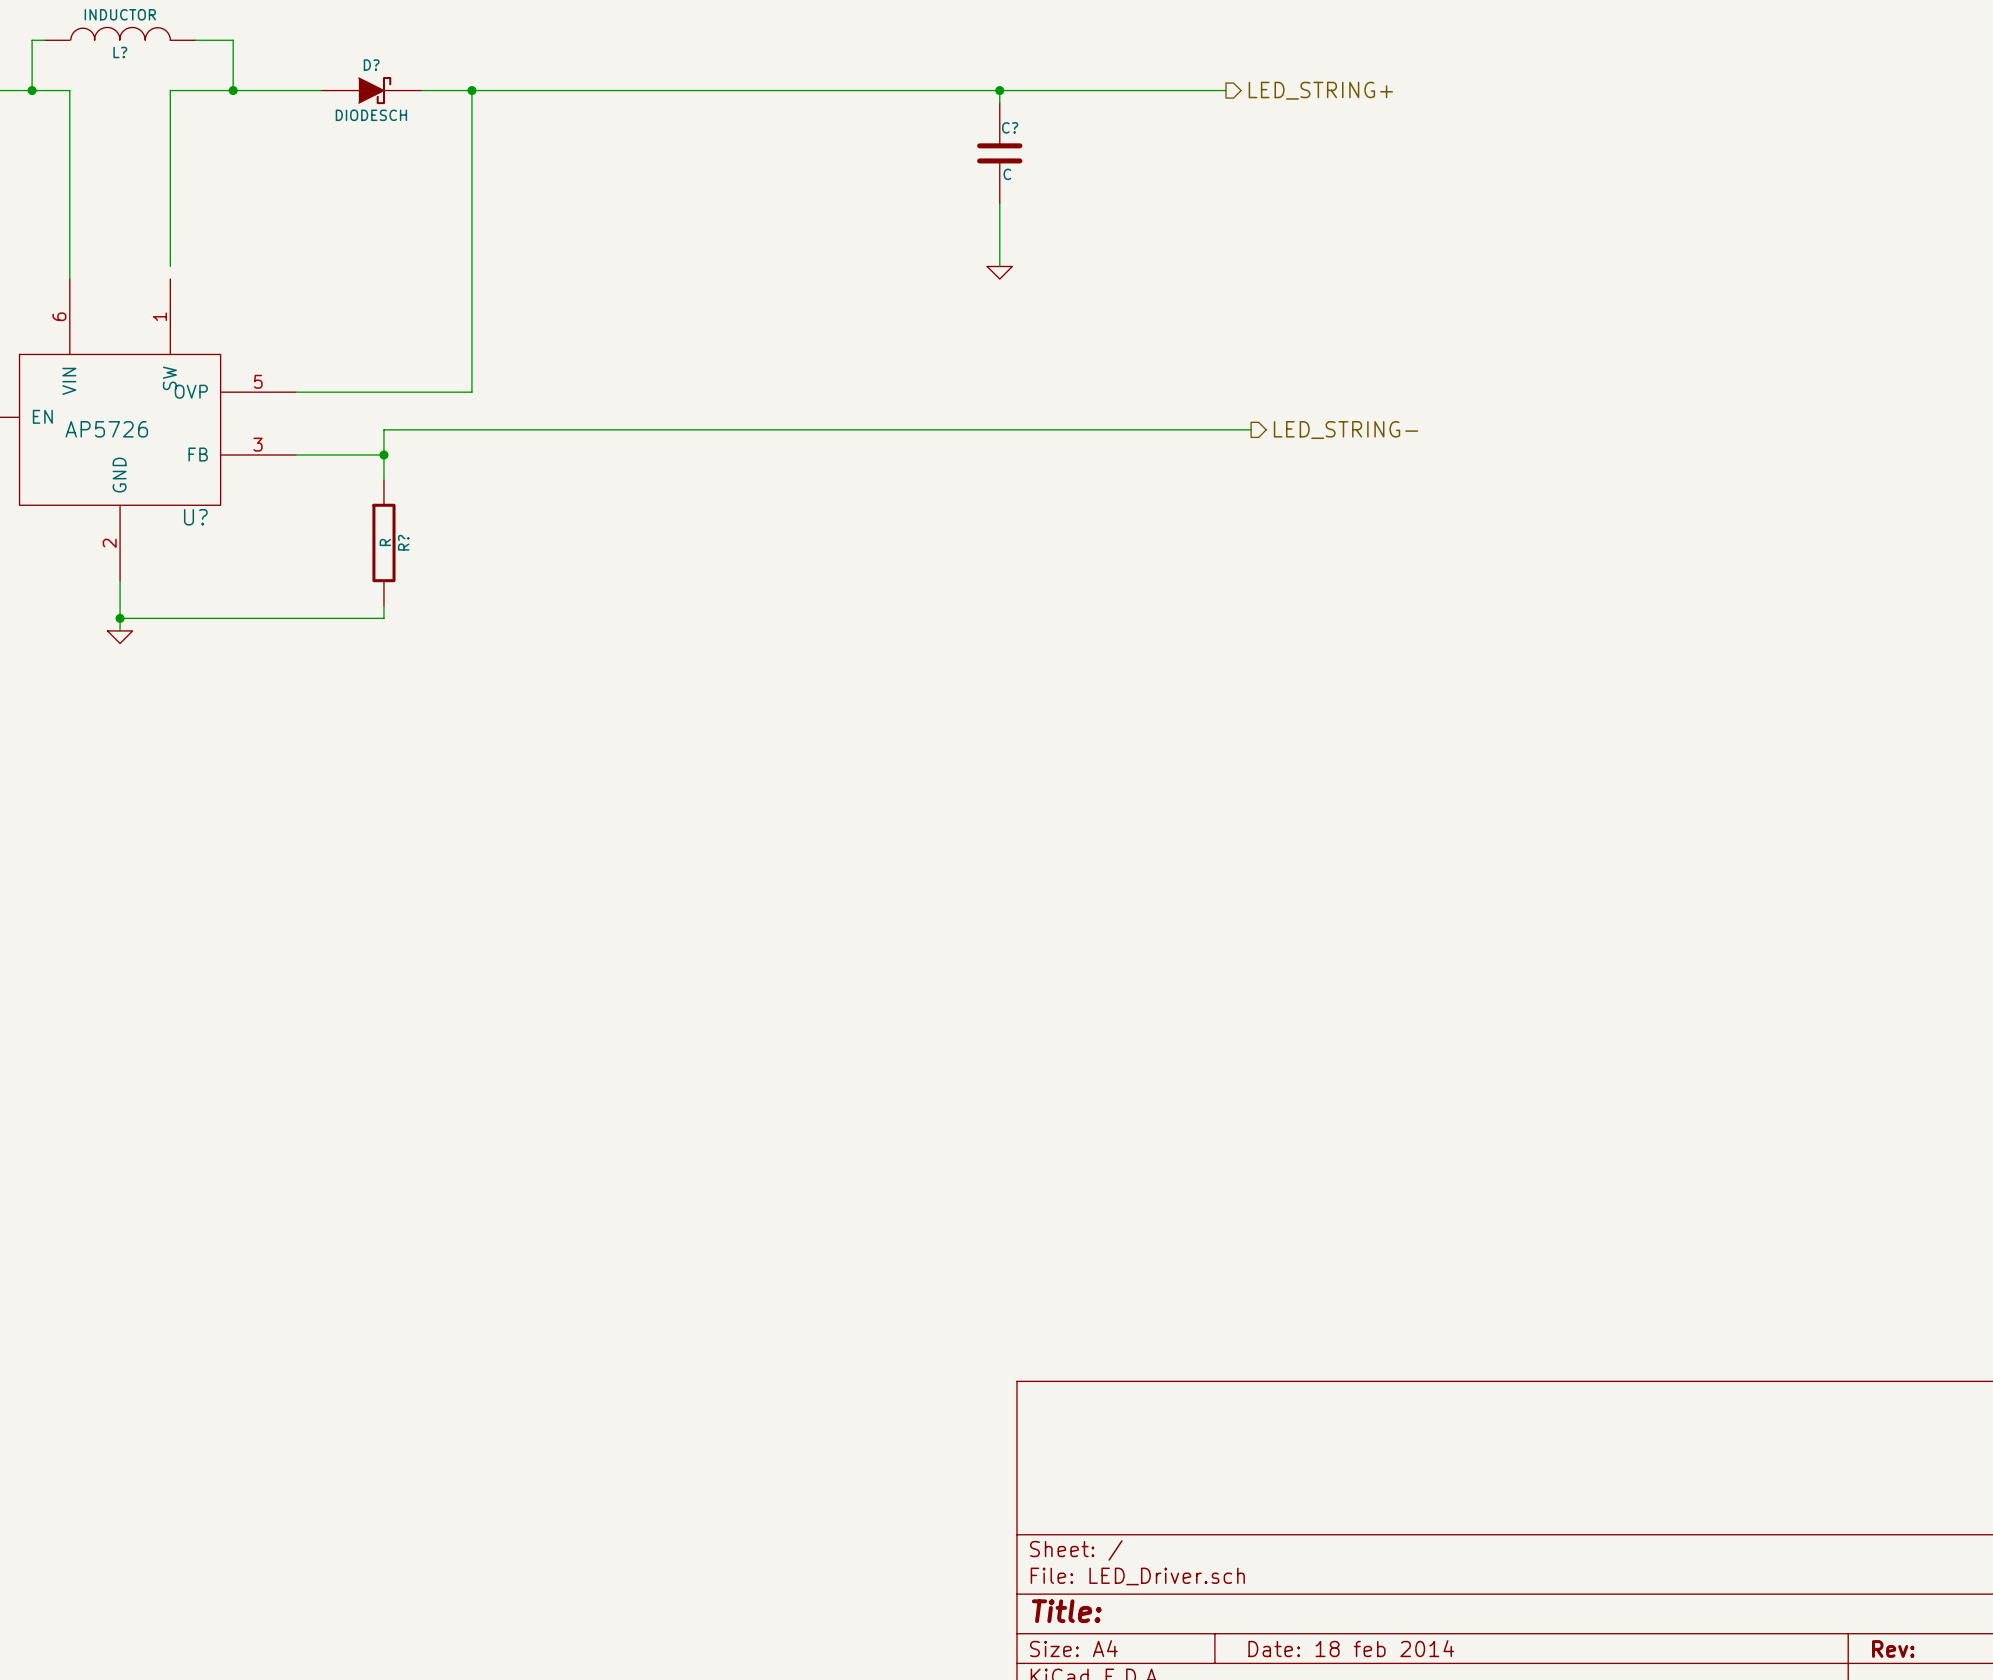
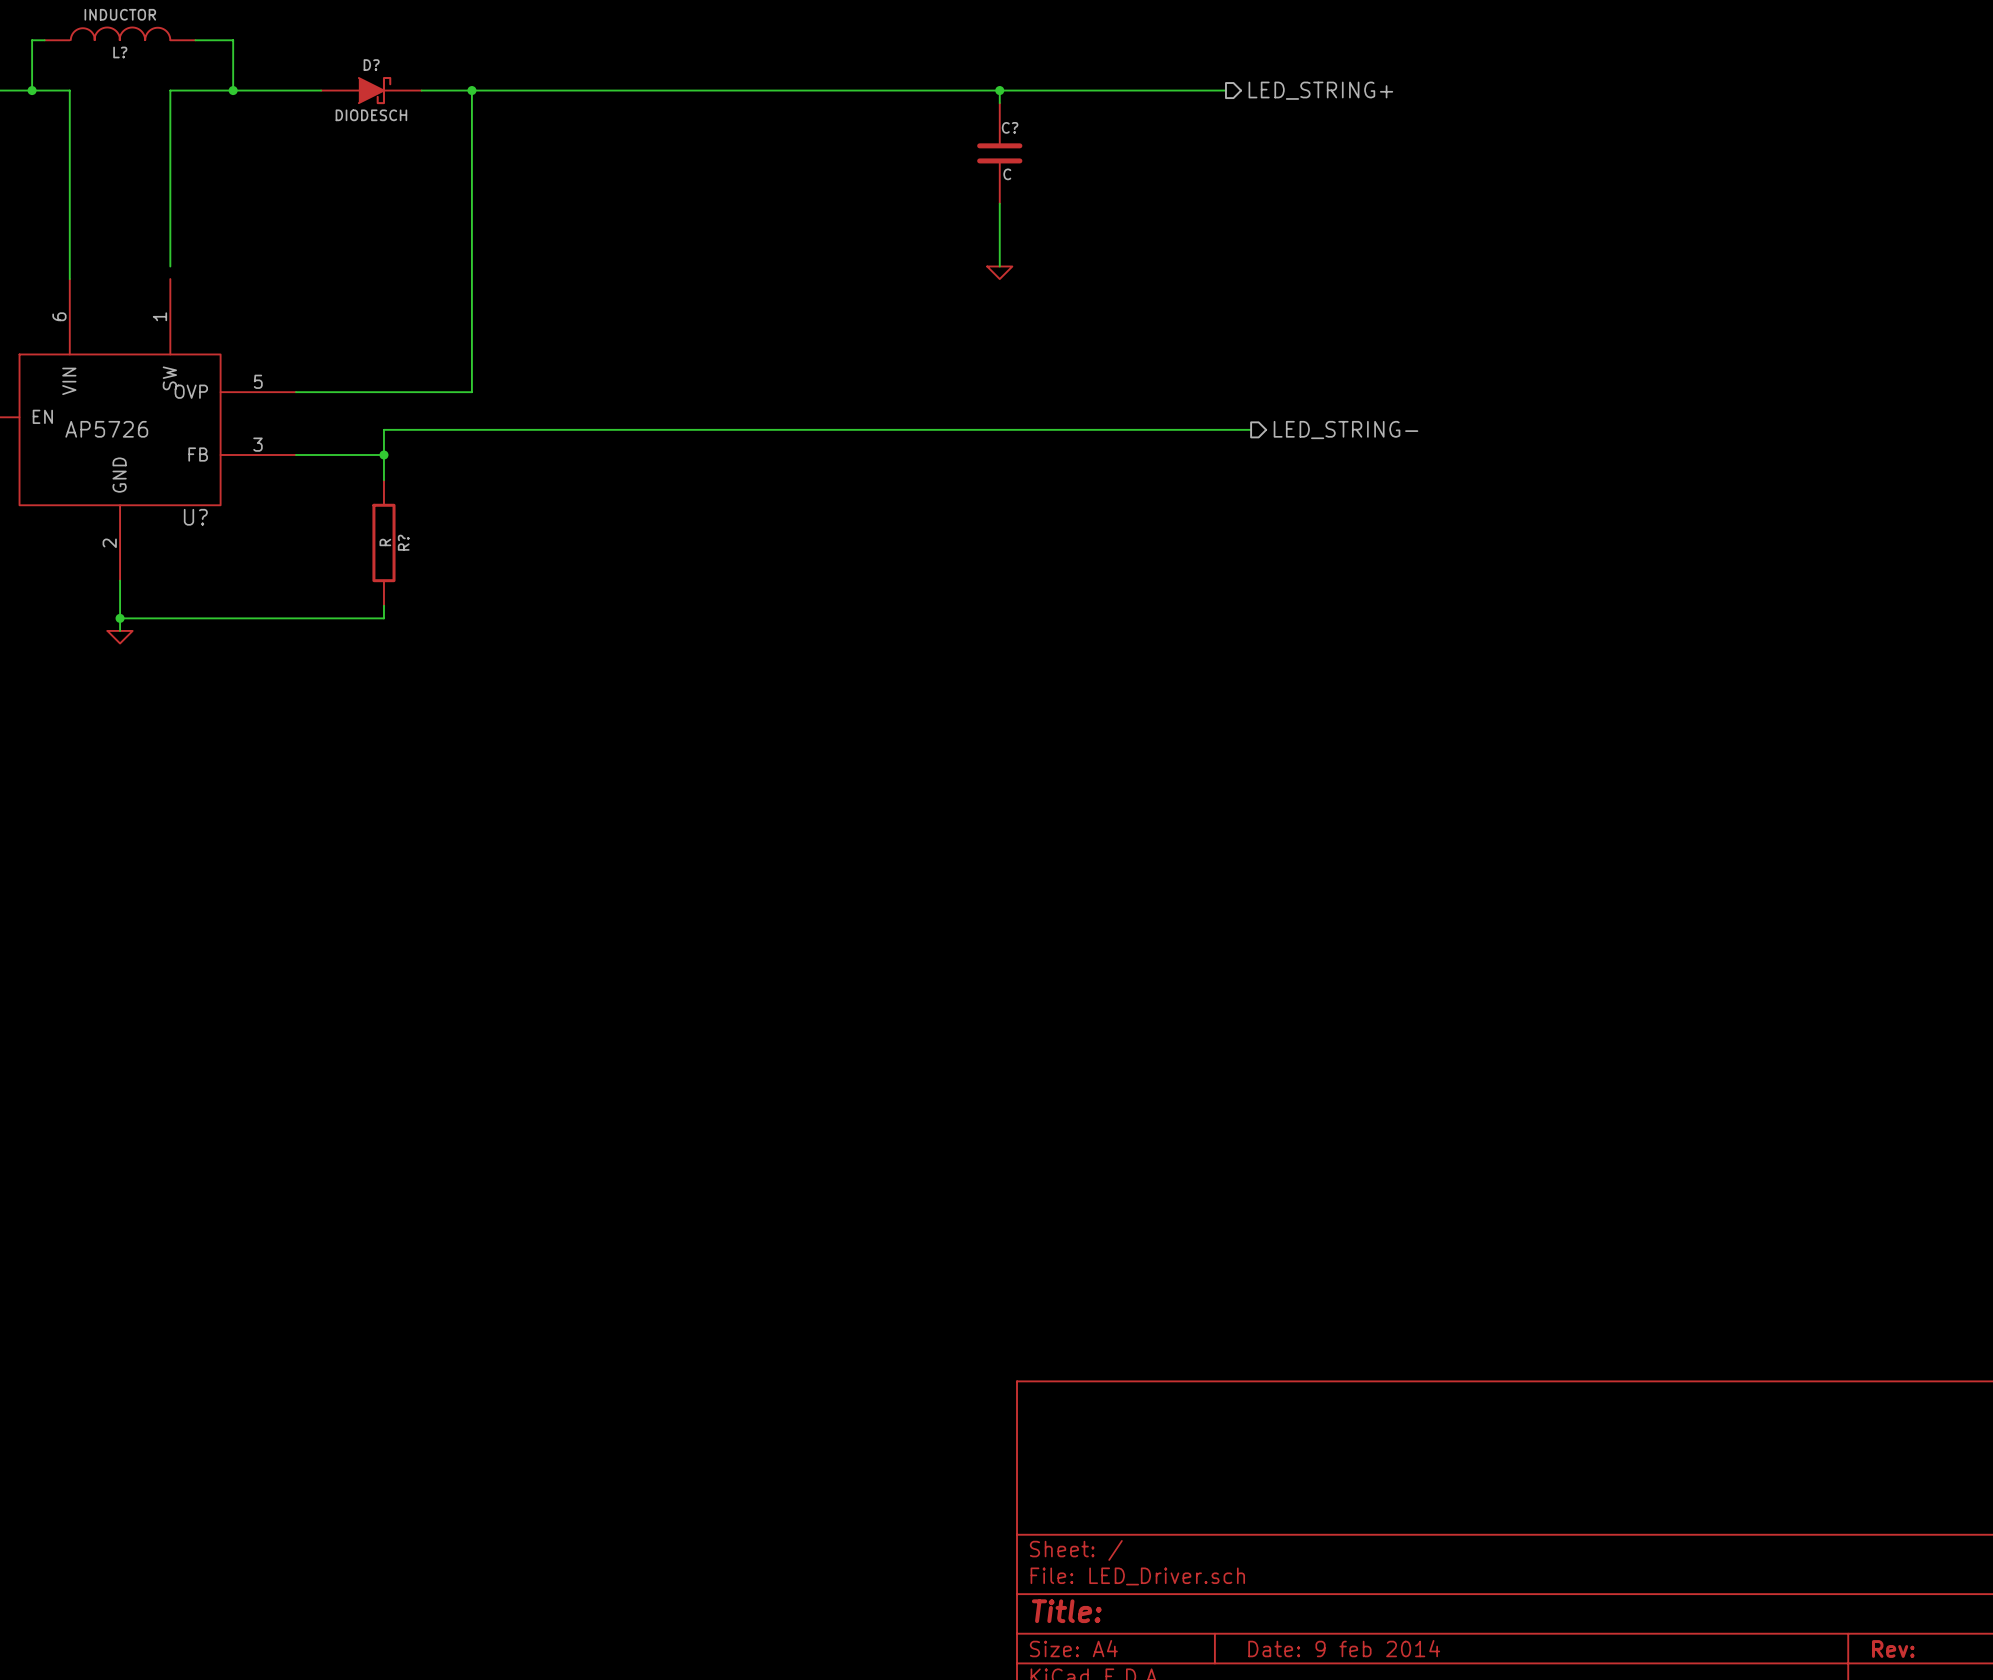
title block: Date: 18 feb 2014 (1351, 1648) -> Date: 9 feb 2014 (1344, 1648)

